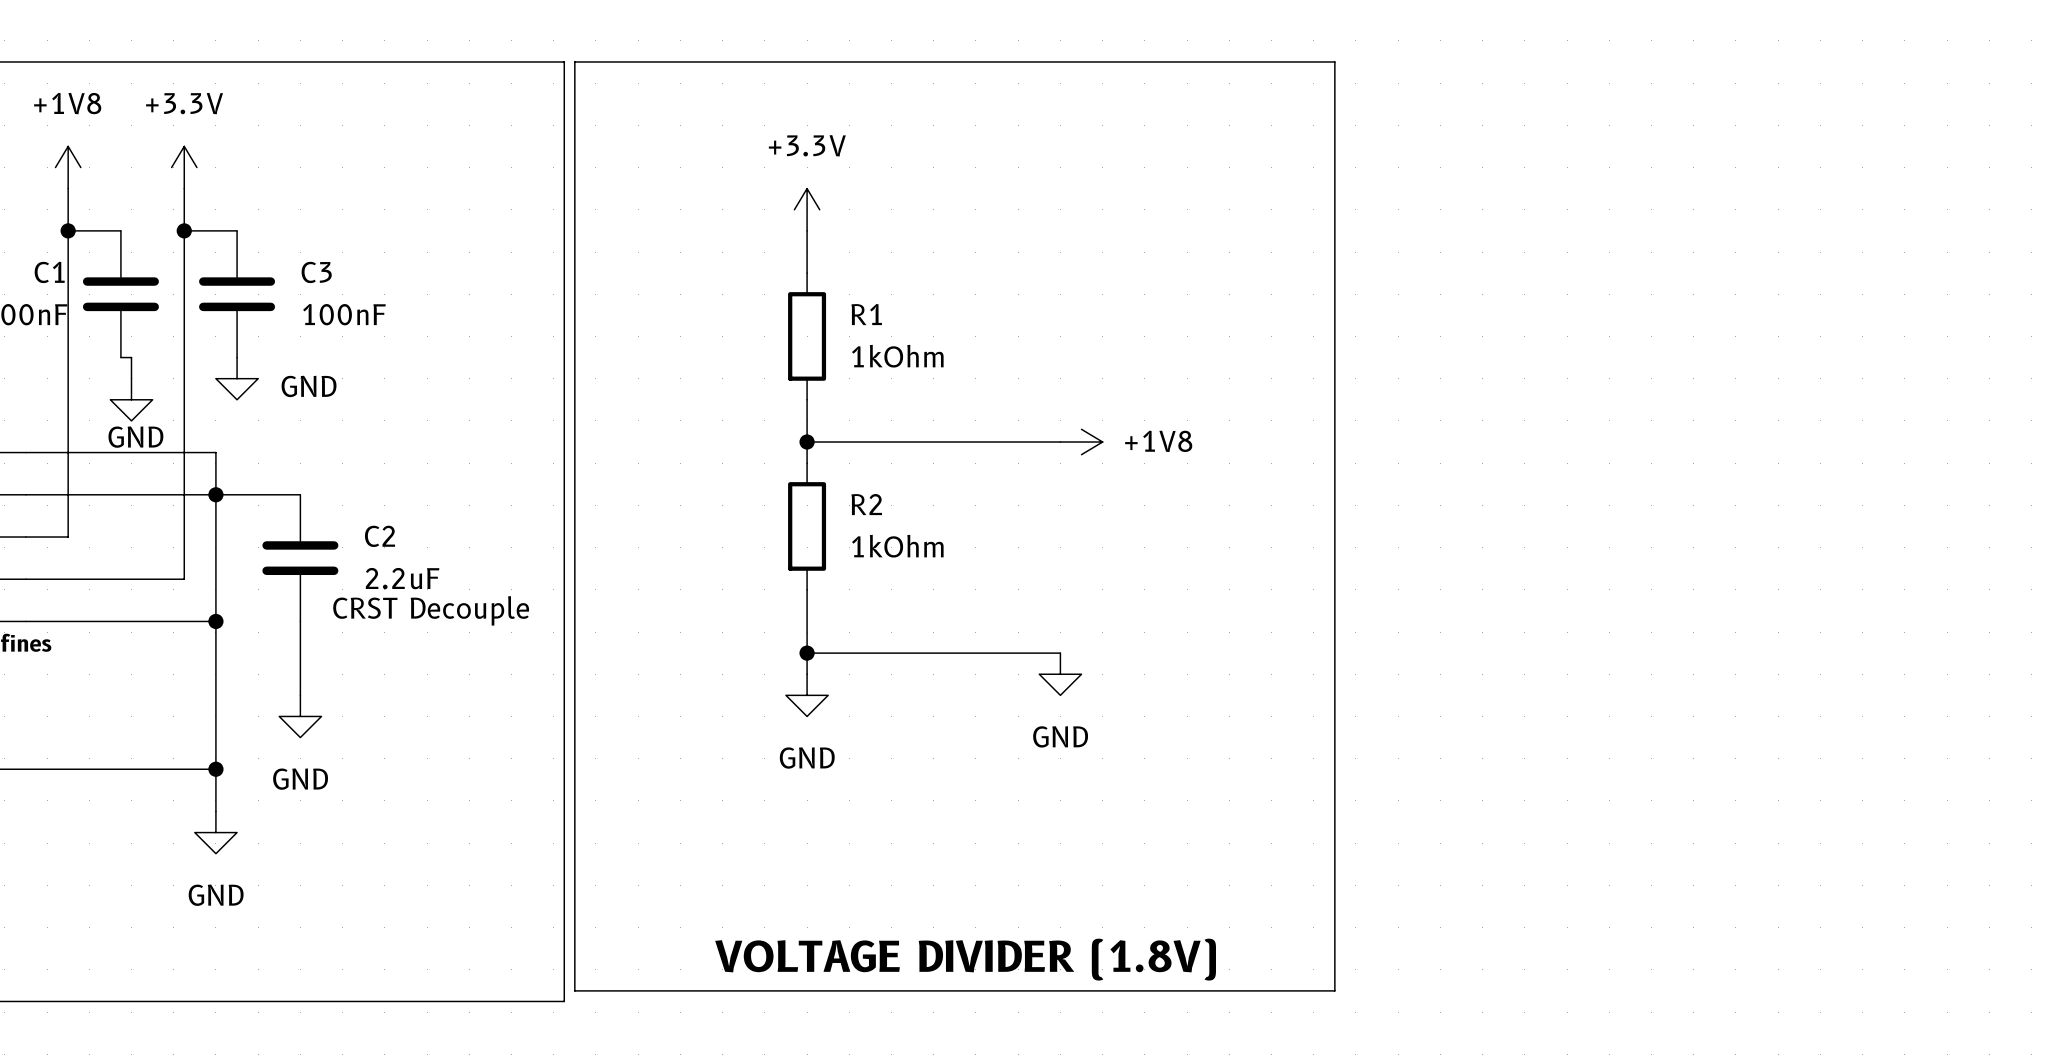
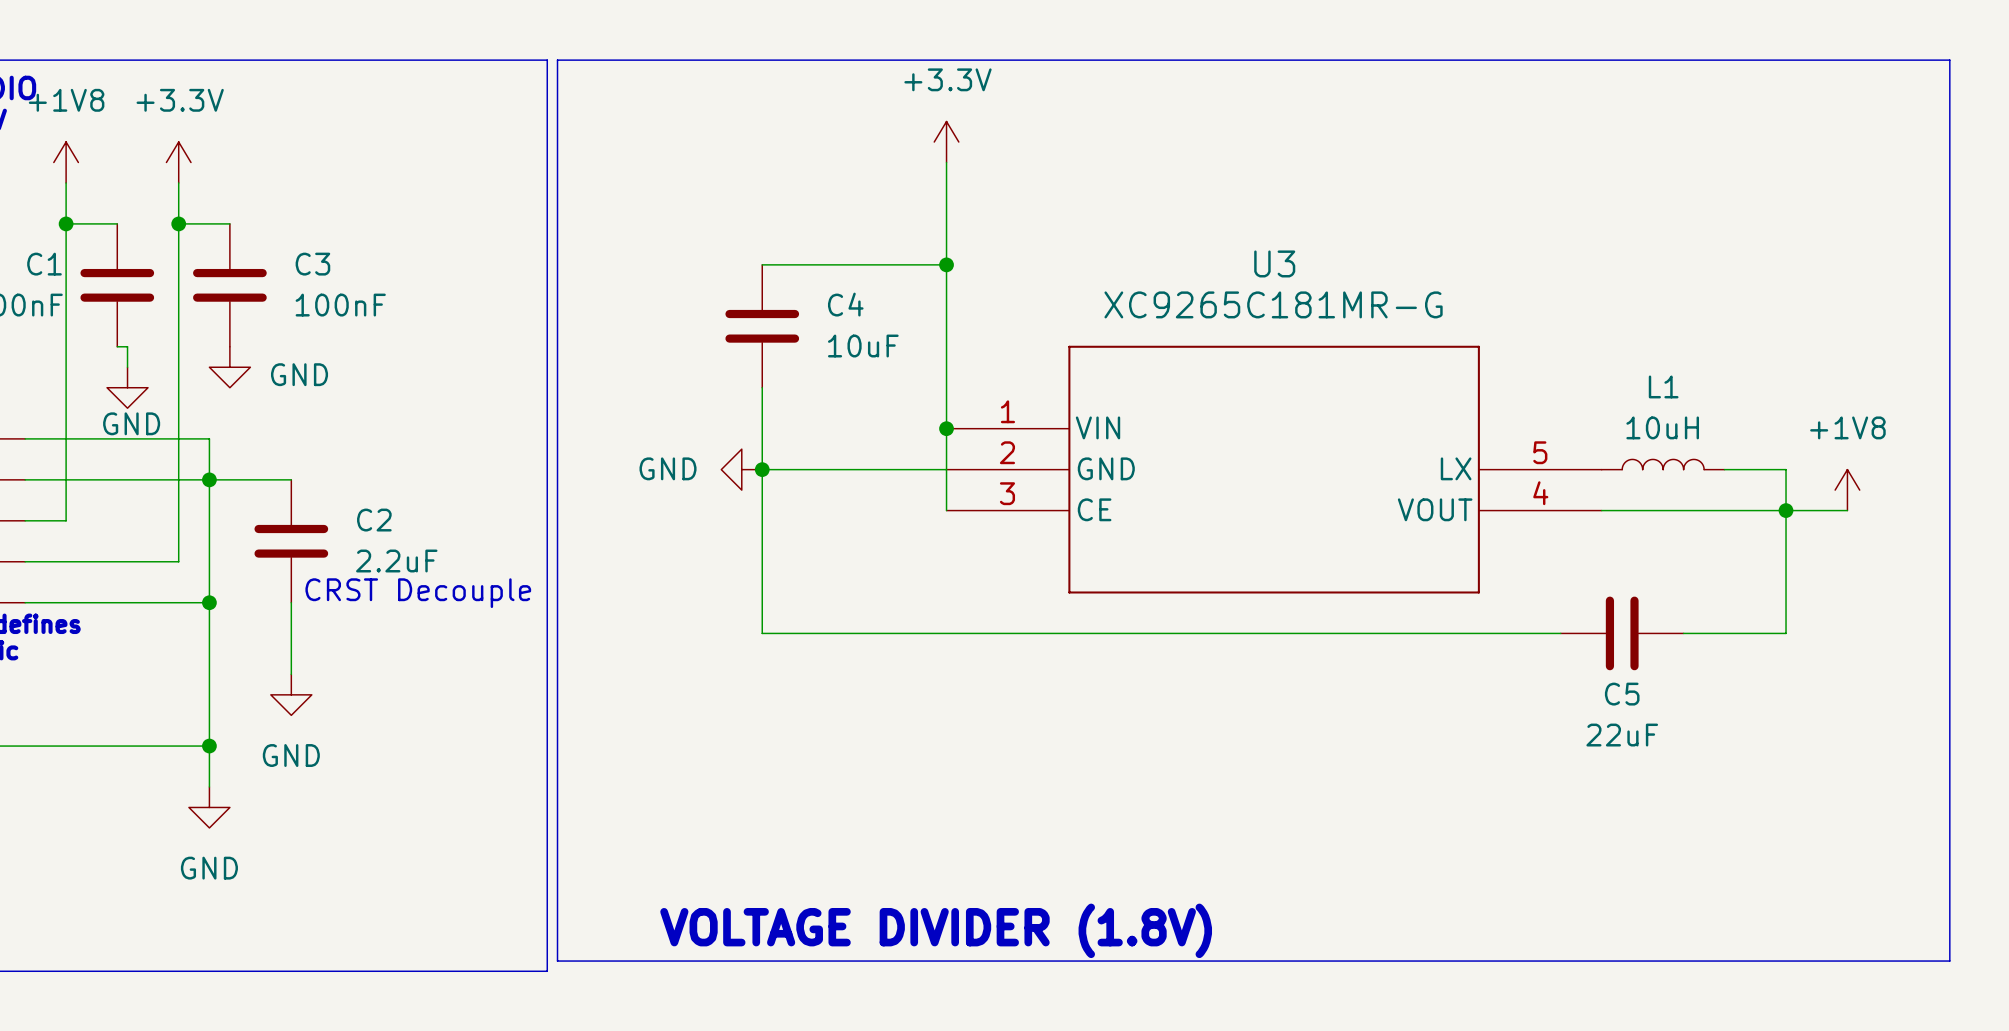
line: (1334, 61) (1334, 990) -> (1294, 60) (1949, 60) (1949, 961) (1294, 961)
wire: none -> (946, 162) (946, 510)
power symbol position: +3.3V (807, 209) -> +3.3V (946, 142)
wire: (807, 230) (807, 273) -> none
wire: none -> (762, 264) (946, 264)
junction: none -> (946, 264)
C4: none -> 10uF (762, 326)
R1: 1kOhm (807, 336) -> none
wire: none -> (762, 387) (762, 633) (782, 633)
wire: (807, 399) (807, 463) -> none
wire: (807, 442) (1060, 442) -> none
junction position: (807, 442) -> (762, 469)
junction: none -> (946, 428)
power symbol: +1V8 (1081, 442) -> none
L1: none -> 10uH (1663, 464)
power symbol: none -> GND (741, 469)
wire: none -> (762, 469) (946, 469)
U3: none -> XC9265C181MR-G (1274, 469)
wire: none -> (1724, 469) (1786, 469) (1786, 633) (1683, 633)
power symbol: none -> +1V8 (1847, 490)
R2: 1kOhm (807, 526) -> none
wire: none -> (1601, 510) (1847, 510)
junction: none -> (1786, 510)
wire: (807, 589) (807, 674) -> none
junction: (807, 653) -> none
wire: none -> (1028, 633) (1560, 633)
C5: none -> 22uF (1622, 633)
power symbol: GND (1060, 674) -> none
power symbol: GND (807, 695) -> none

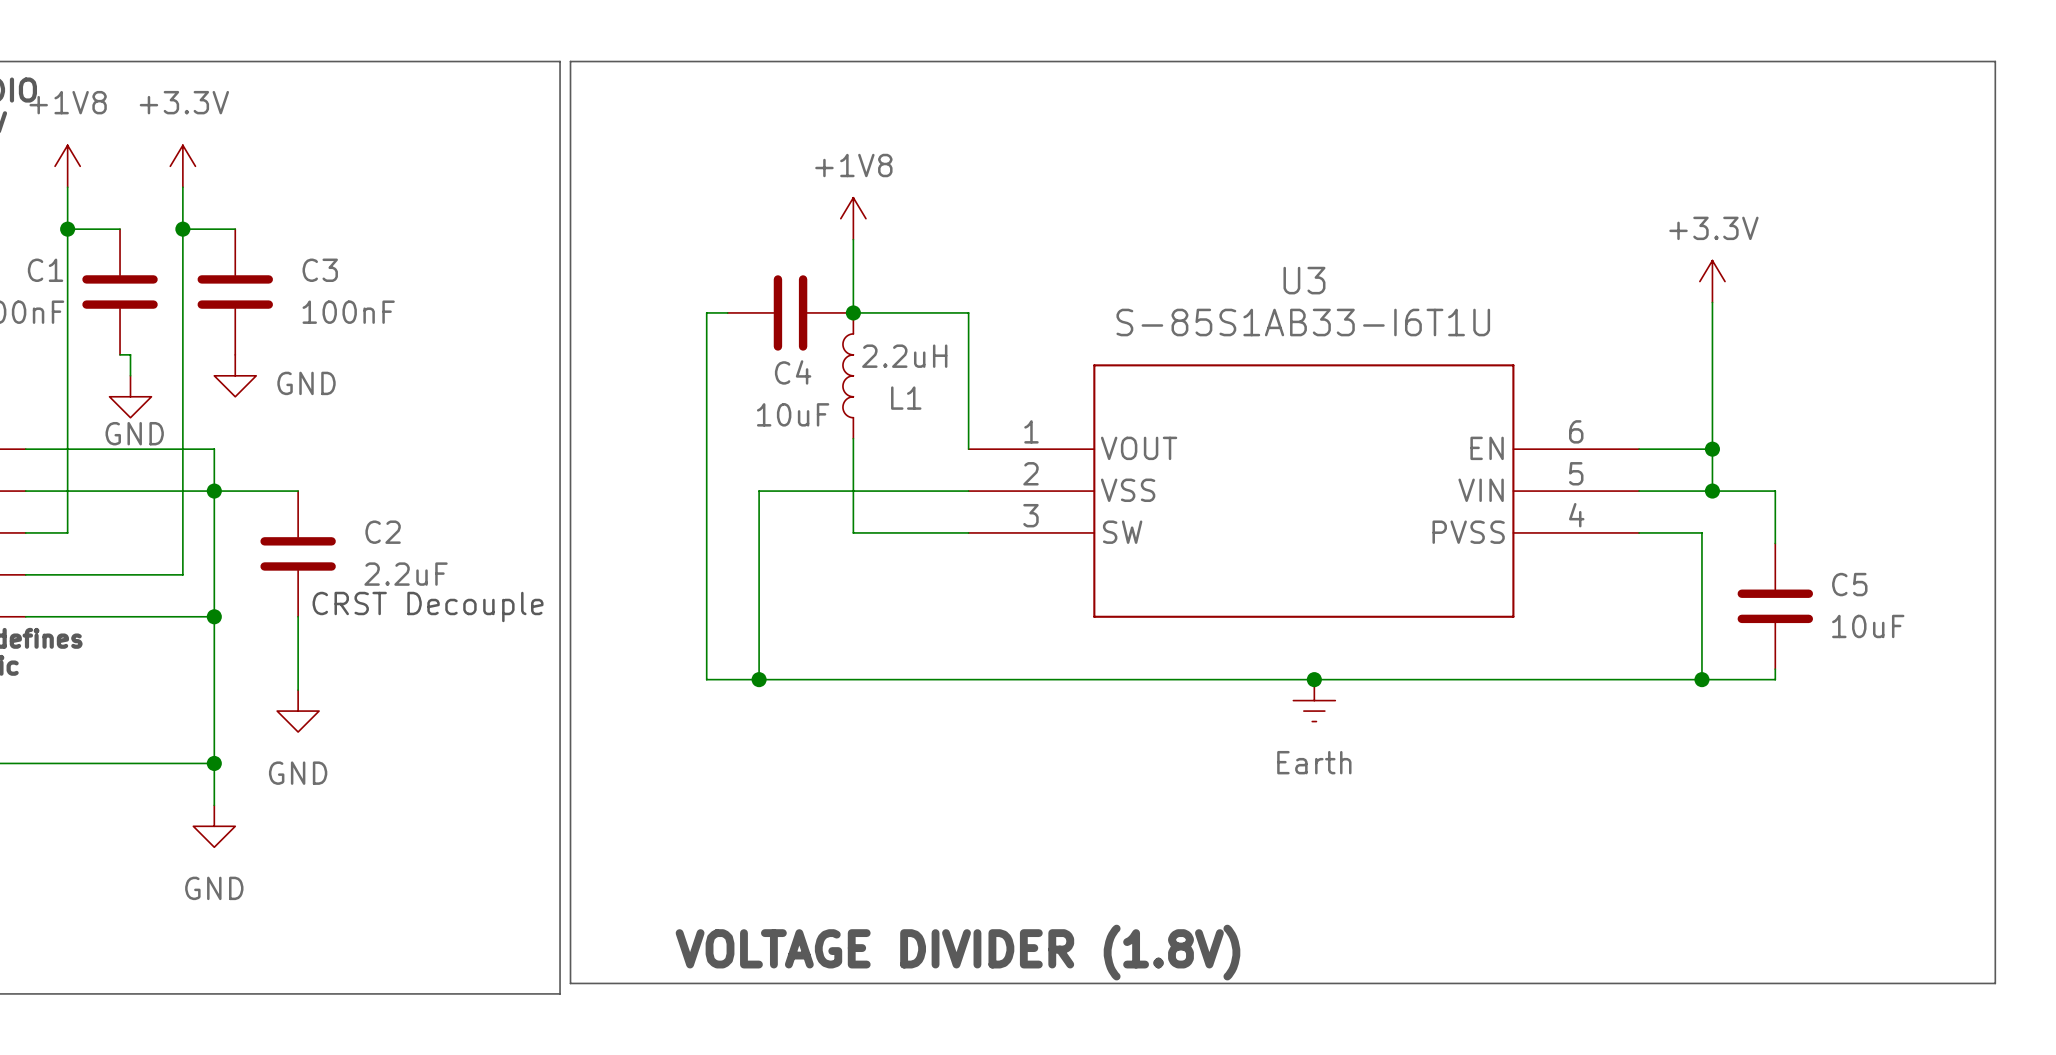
power symbol: +3.3V (946, 142) -> none
wire: (946, 162) (946, 305) -> (853, 239) (853, 312) (968, 312)
power symbol: none -> +1V8 (853, 218)
wire: (762, 264) (946, 264) -> none
junction: (946, 264) -> none
power symbol: none -> +3.3V (1712, 281)
wire: none -> (1712, 302) (1712, 491)
C4 name position: C4 (845, 304) -> C4 (793, 372)
U3 value: XC9265C181MR-G (1273, 304) -> S-85S1AB33-I6T1U (1303, 322)
wire: none -> (727, 312) (706, 312) (706, 679) (1775, 679) (1775, 669)
junction: none -> (853, 312)
C4 rotation: 0° (762, 326) -> 90° clockwise (790, 312)
U3 symbol: [946, 345, 1602, 594] -> [968, 364, 1640, 618]
L1 name position: L1 (1663, 386) -> L1 (906, 398)
wire: (762, 387) (762, 633) (1560, 633) -> none
L1 value: 10uH (1662, 427) -> 2.2uH (904, 356)
wire: none -> (853, 438) (853, 532) (968, 532)
junction: (946, 428) -> none
wire: (946, 438) (946, 510) -> none
wire: none -> (1639, 449) (1712, 449)
junction: none -> (1712, 449)
L1 rotation: 0° (1663, 464) -> 90° counterclockwise (848, 375)
L1 position: (1663, 464) -> (848, 375)
power symbol: GND (741, 469) -> none
wire: (762, 469) (946, 469) -> none
junction: (762, 469) -> none
wire: (1724, 469) (1786, 469) (1786, 633) (1683, 633) -> none
wire: none -> (968, 491) (759, 491) (759, 679)
wire: none -> (1639, 491) (1775, 491) (1775, 543)
junction: none -> (1712, 491)
power symbol: +1V8 (1847, 490) -> none
wire: (1601, 510) (1847, 510) -> none
junction: (1786, 510) -> none
wire: none -> (1639, 532) (1701, 532) (1701, 679)
C5 rotation: 0° (1622, 633) -> 90° clockwise (1775, 606)
C5 position: (1622, 633) -> (1775, 606)
junction: none -> (759, 679)
junction: none -> (1314, 679)
junction: none -> (1701, 679)
power symbol: none -> Earth (1314, 700)
C5 name position: C5 (1622, 694) -> C5 (1849, 584)
C5 value: 22uF (1622, 735) -> 10uF (1868, 626)

